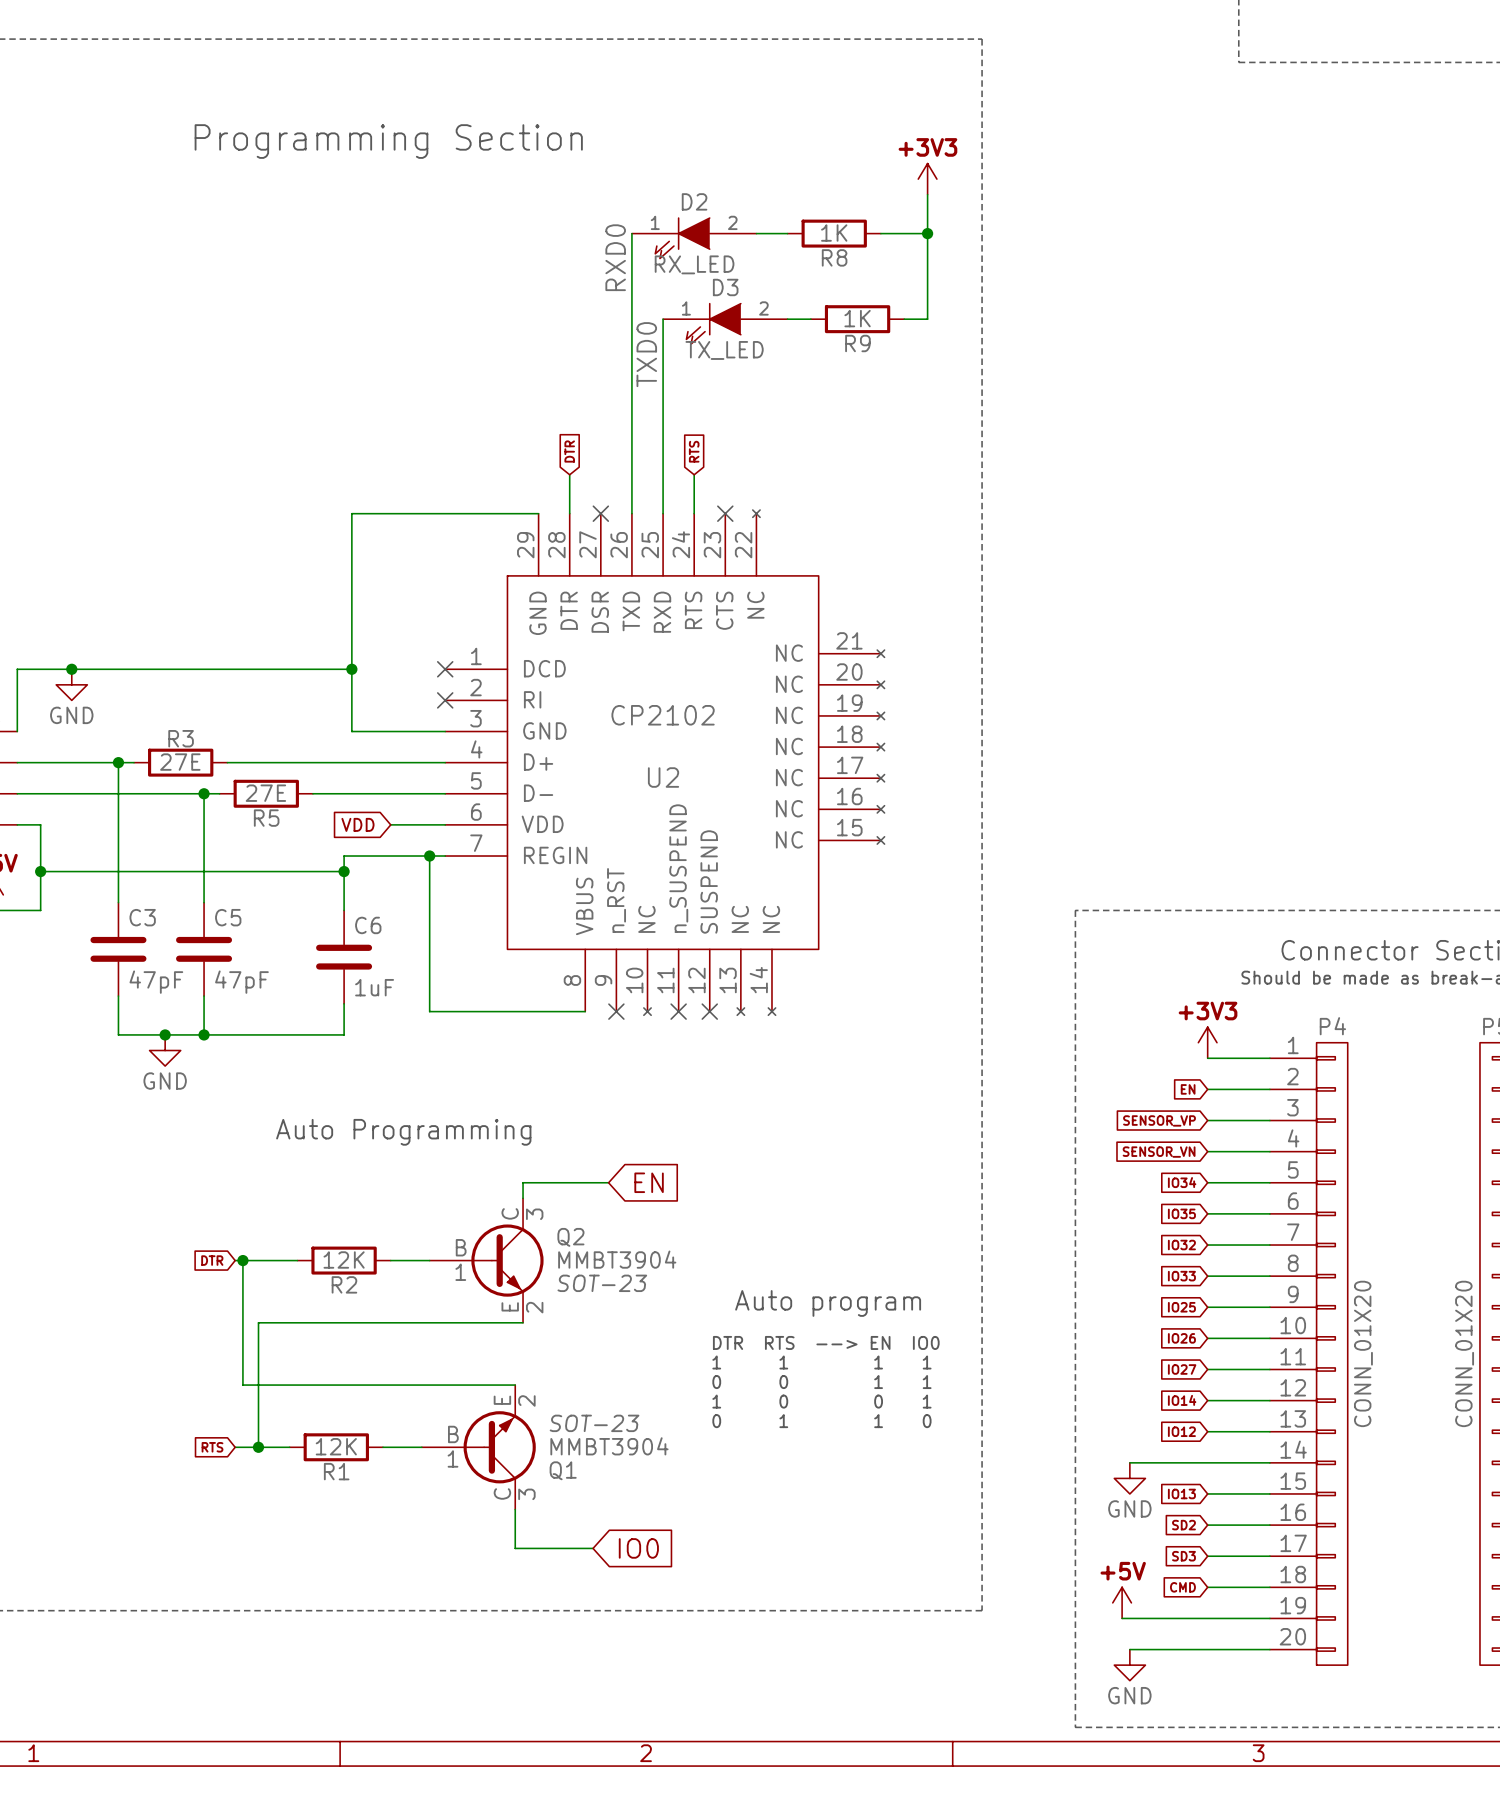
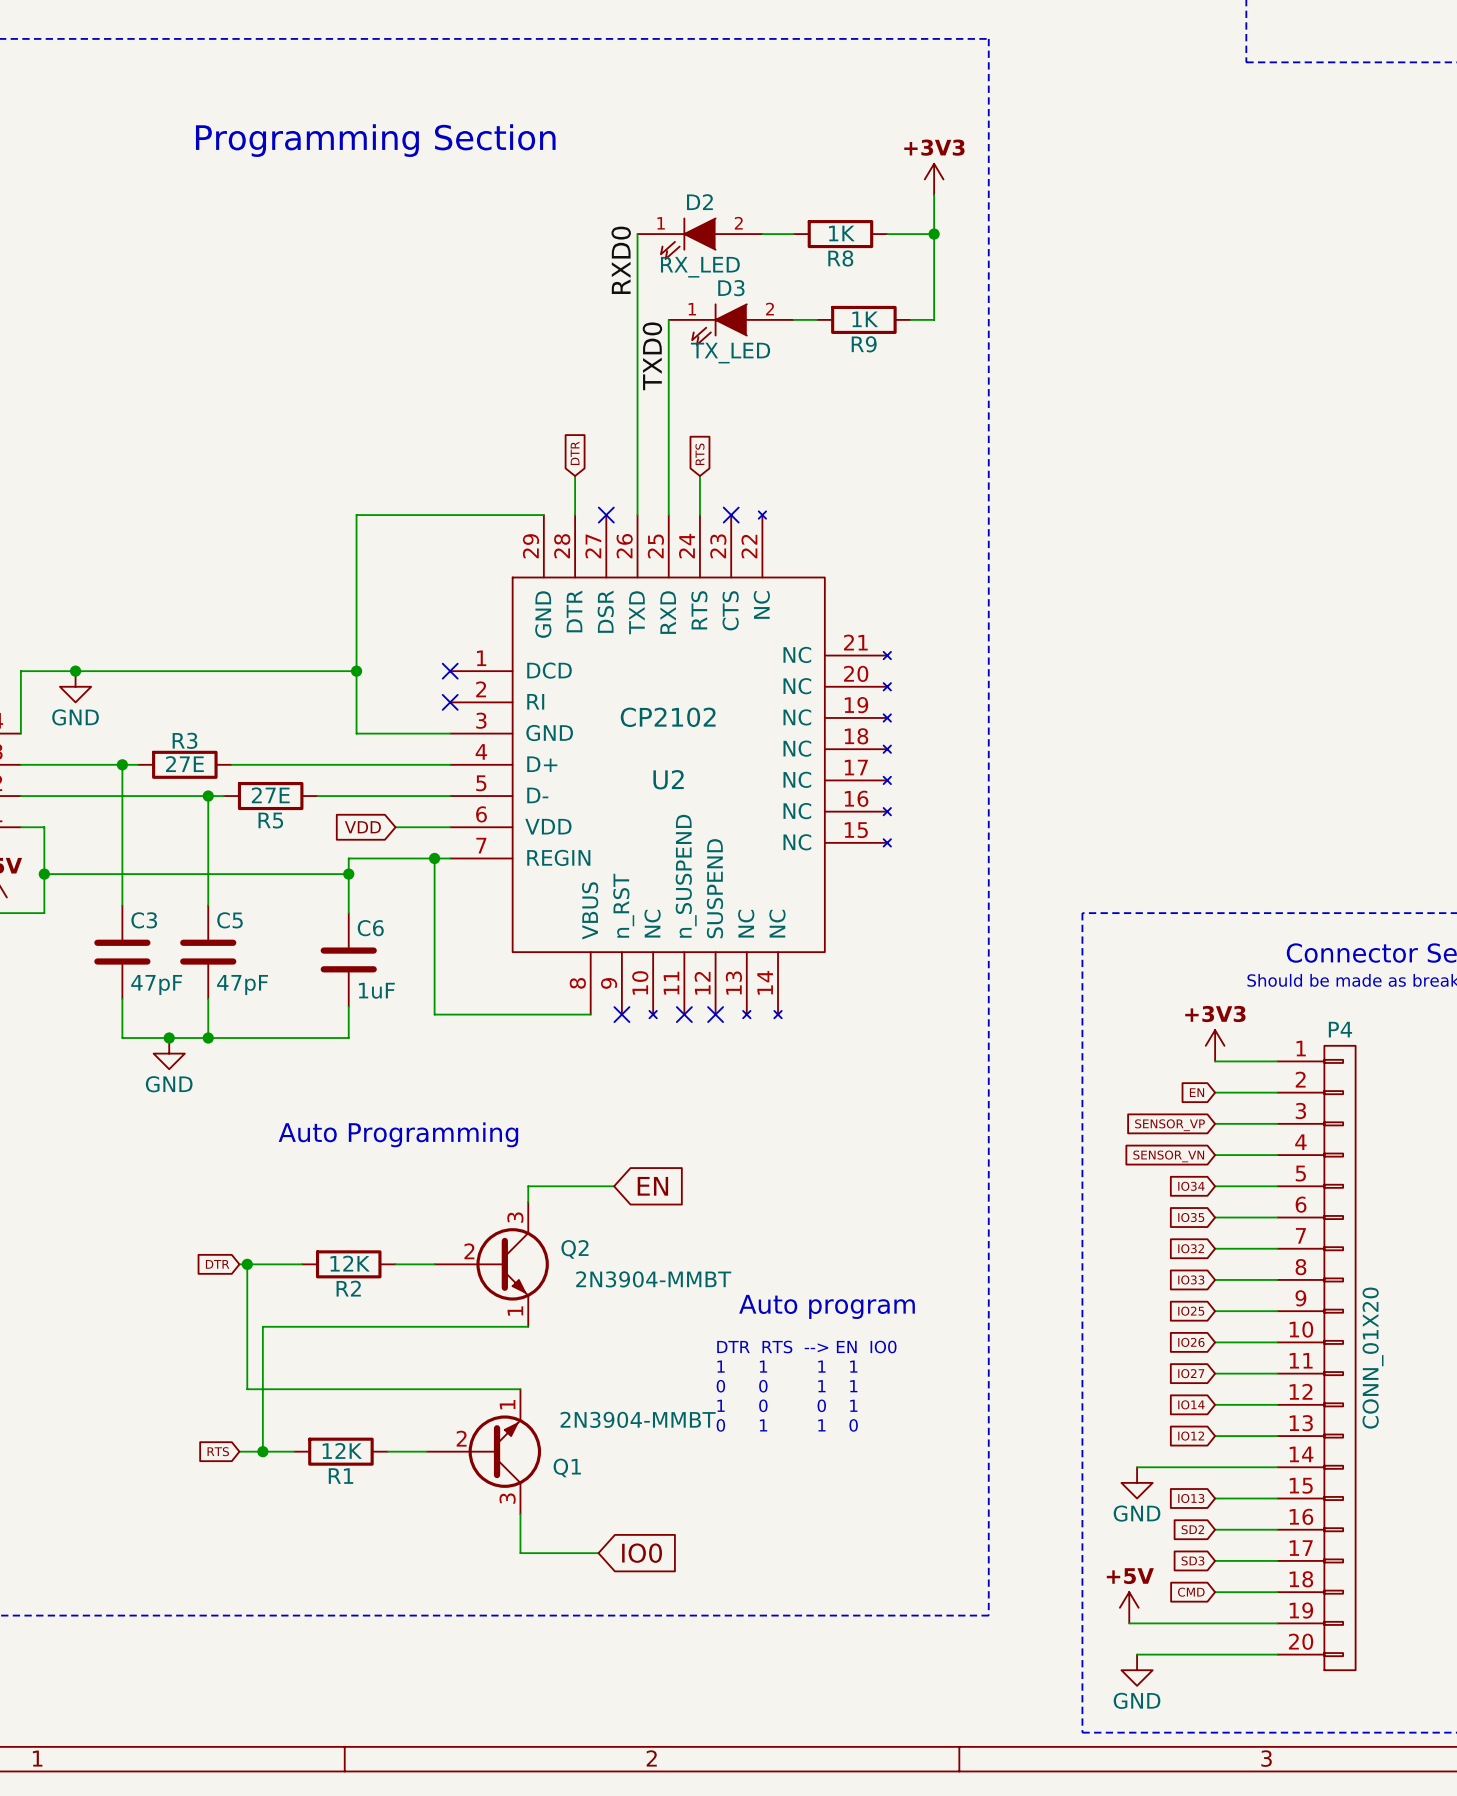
Q2 symbol: [429, 1198, 544, 1323] -> [434, 1201, 549, 1327]
Q2 value: MMBT3904 (617, 1259) -> 2N3904-MMBT (653, 1279)
Q2 text: SOT-23 (602, 1283) -> none
Q1 symbol: [421, 1385, 536, 1510] -> [426, 1389, 542, 1515]
Q1 text: SOT-23 (594, 1423) -> none
Q1 value: MMBT3904 (609, 1446) -> 2N3904-MMBT (638, 1419)

